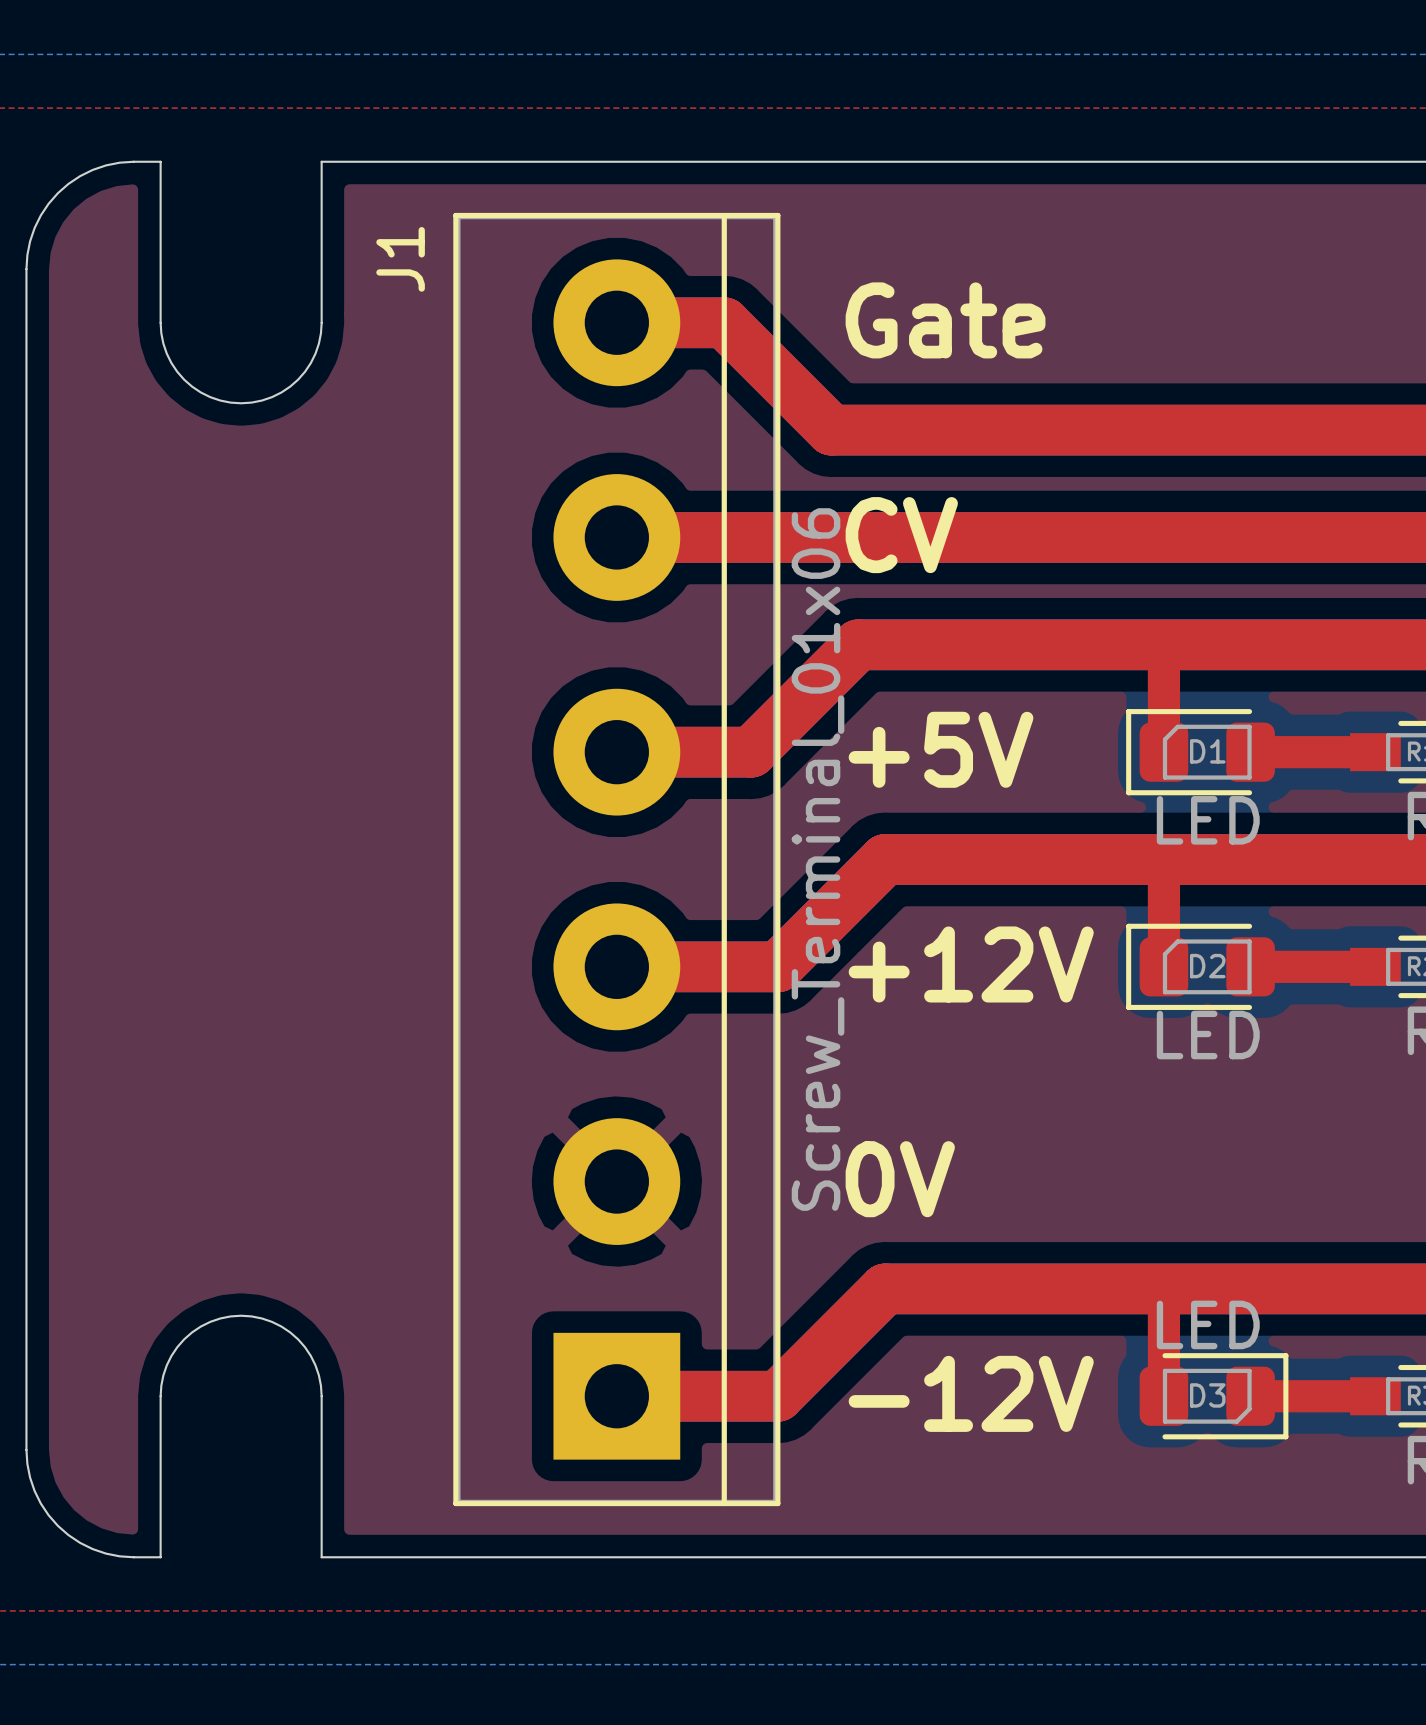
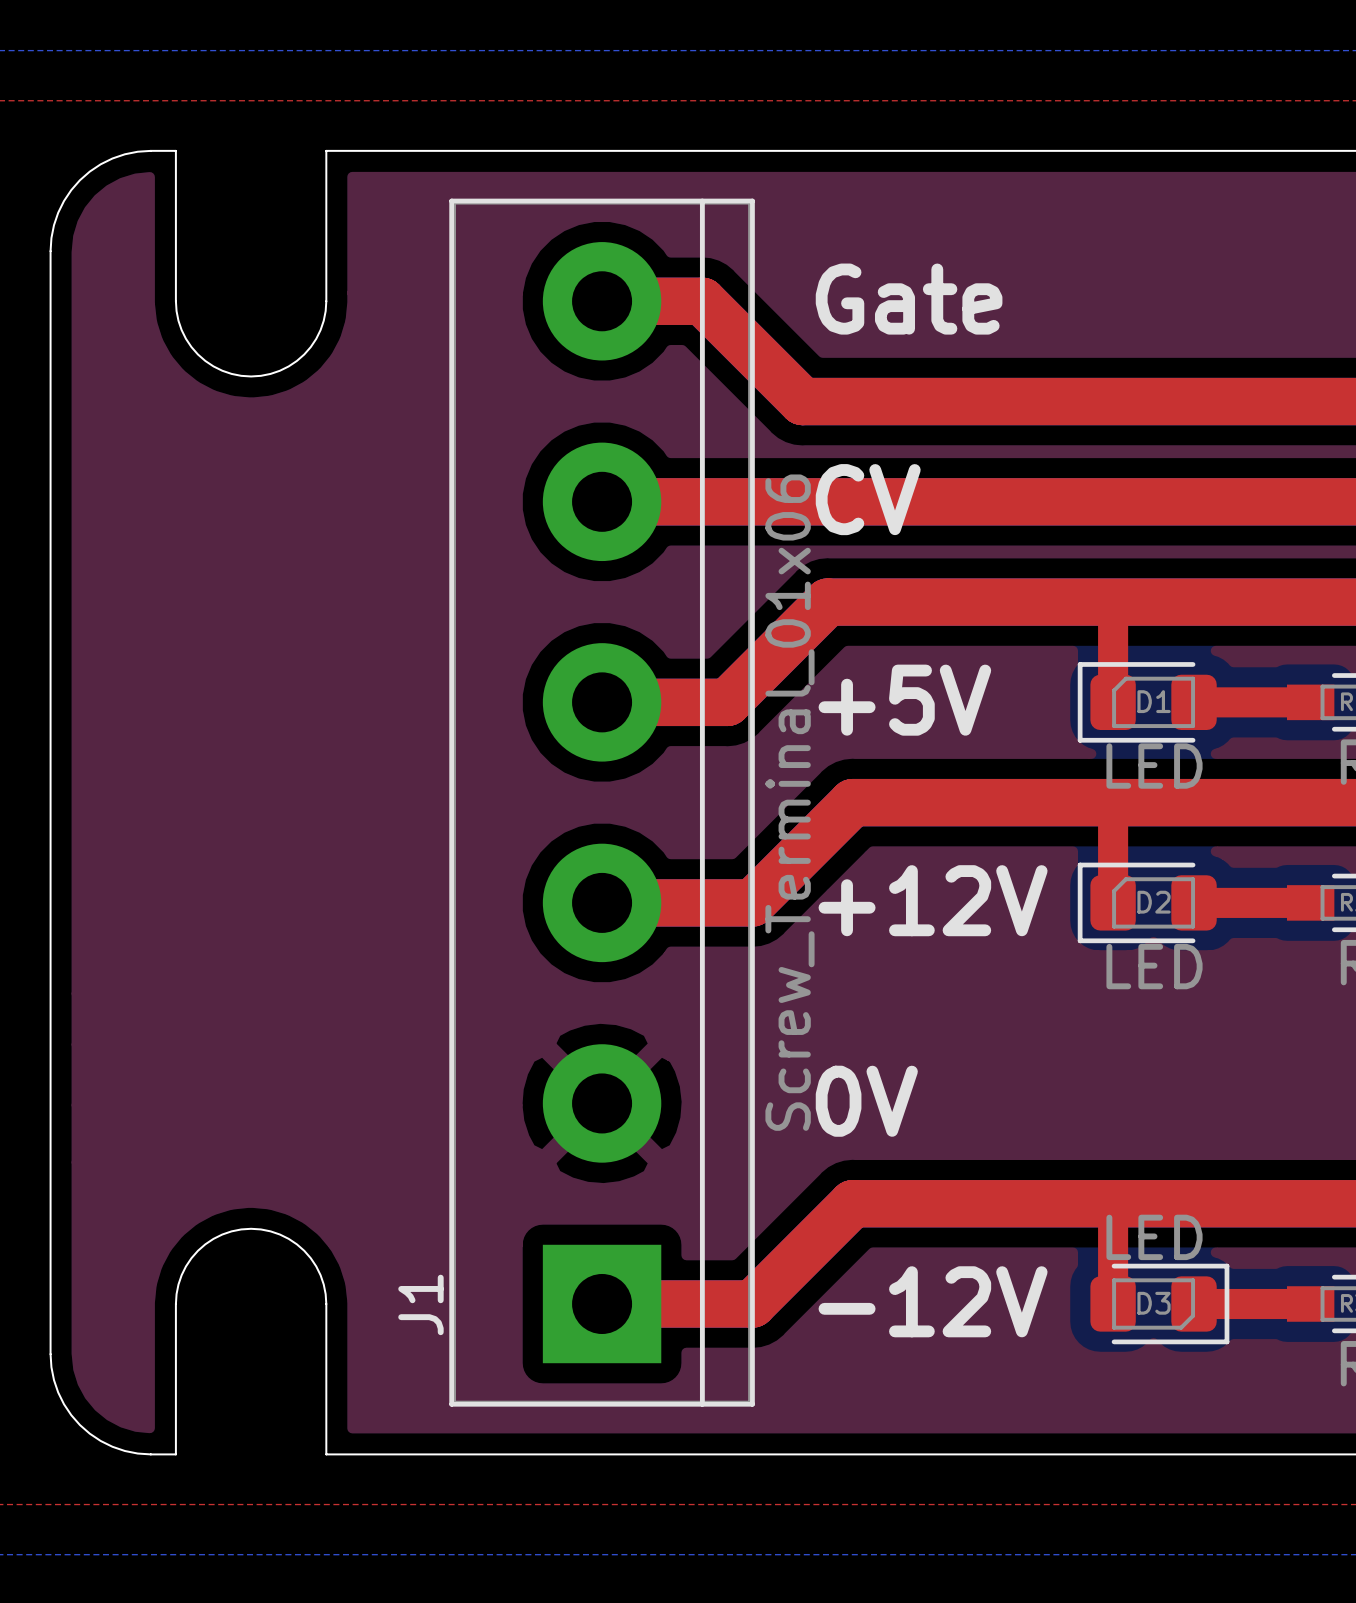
J1 name position: J1 (400, 259) -> J1 (420, 1304)

